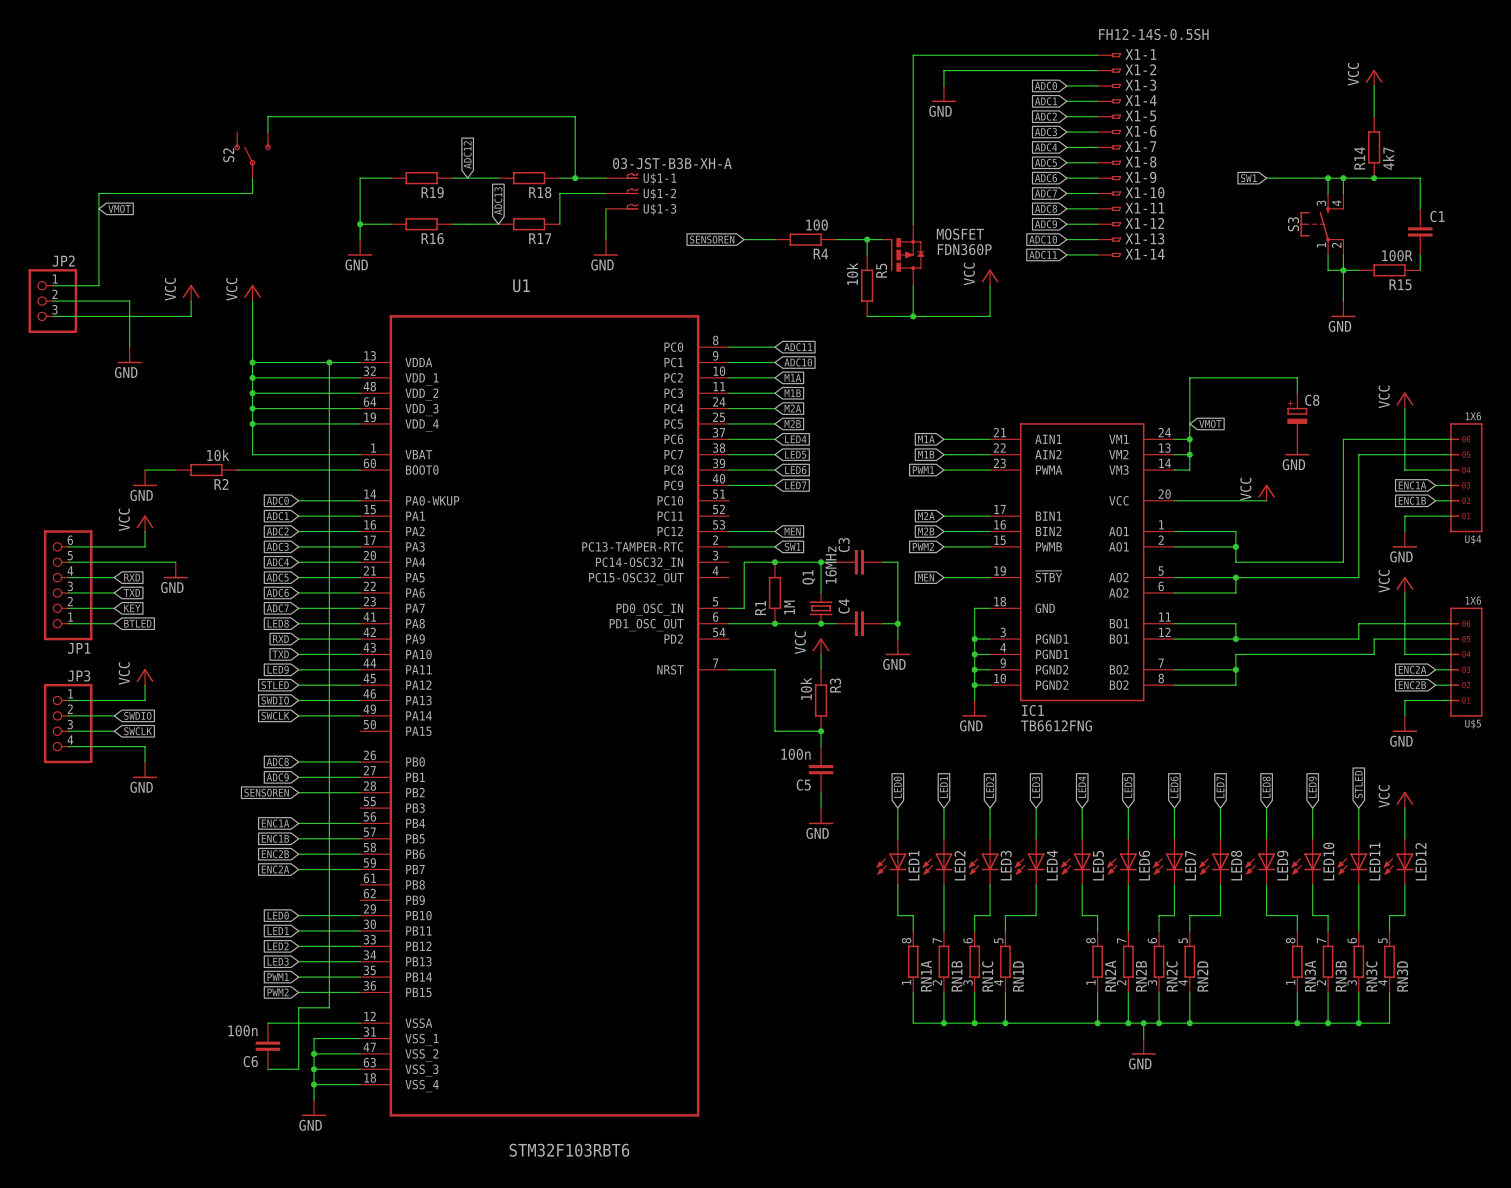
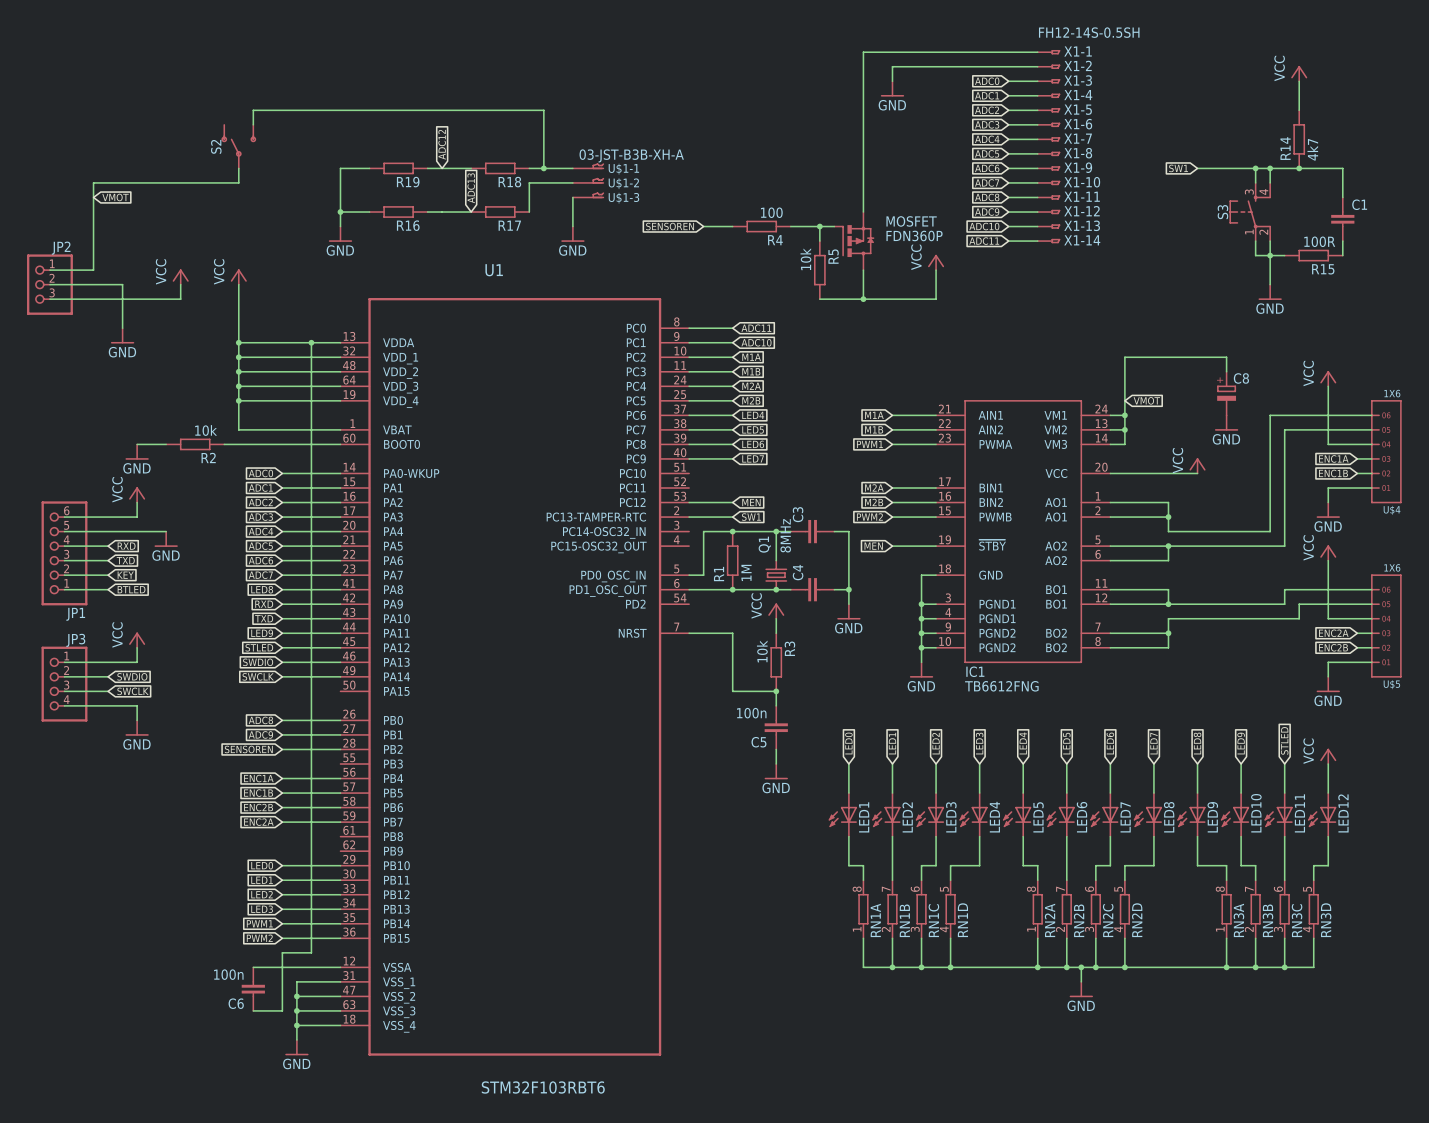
Q1 value: 16MHz (831, 565) -> 8MHz (785, 535)

